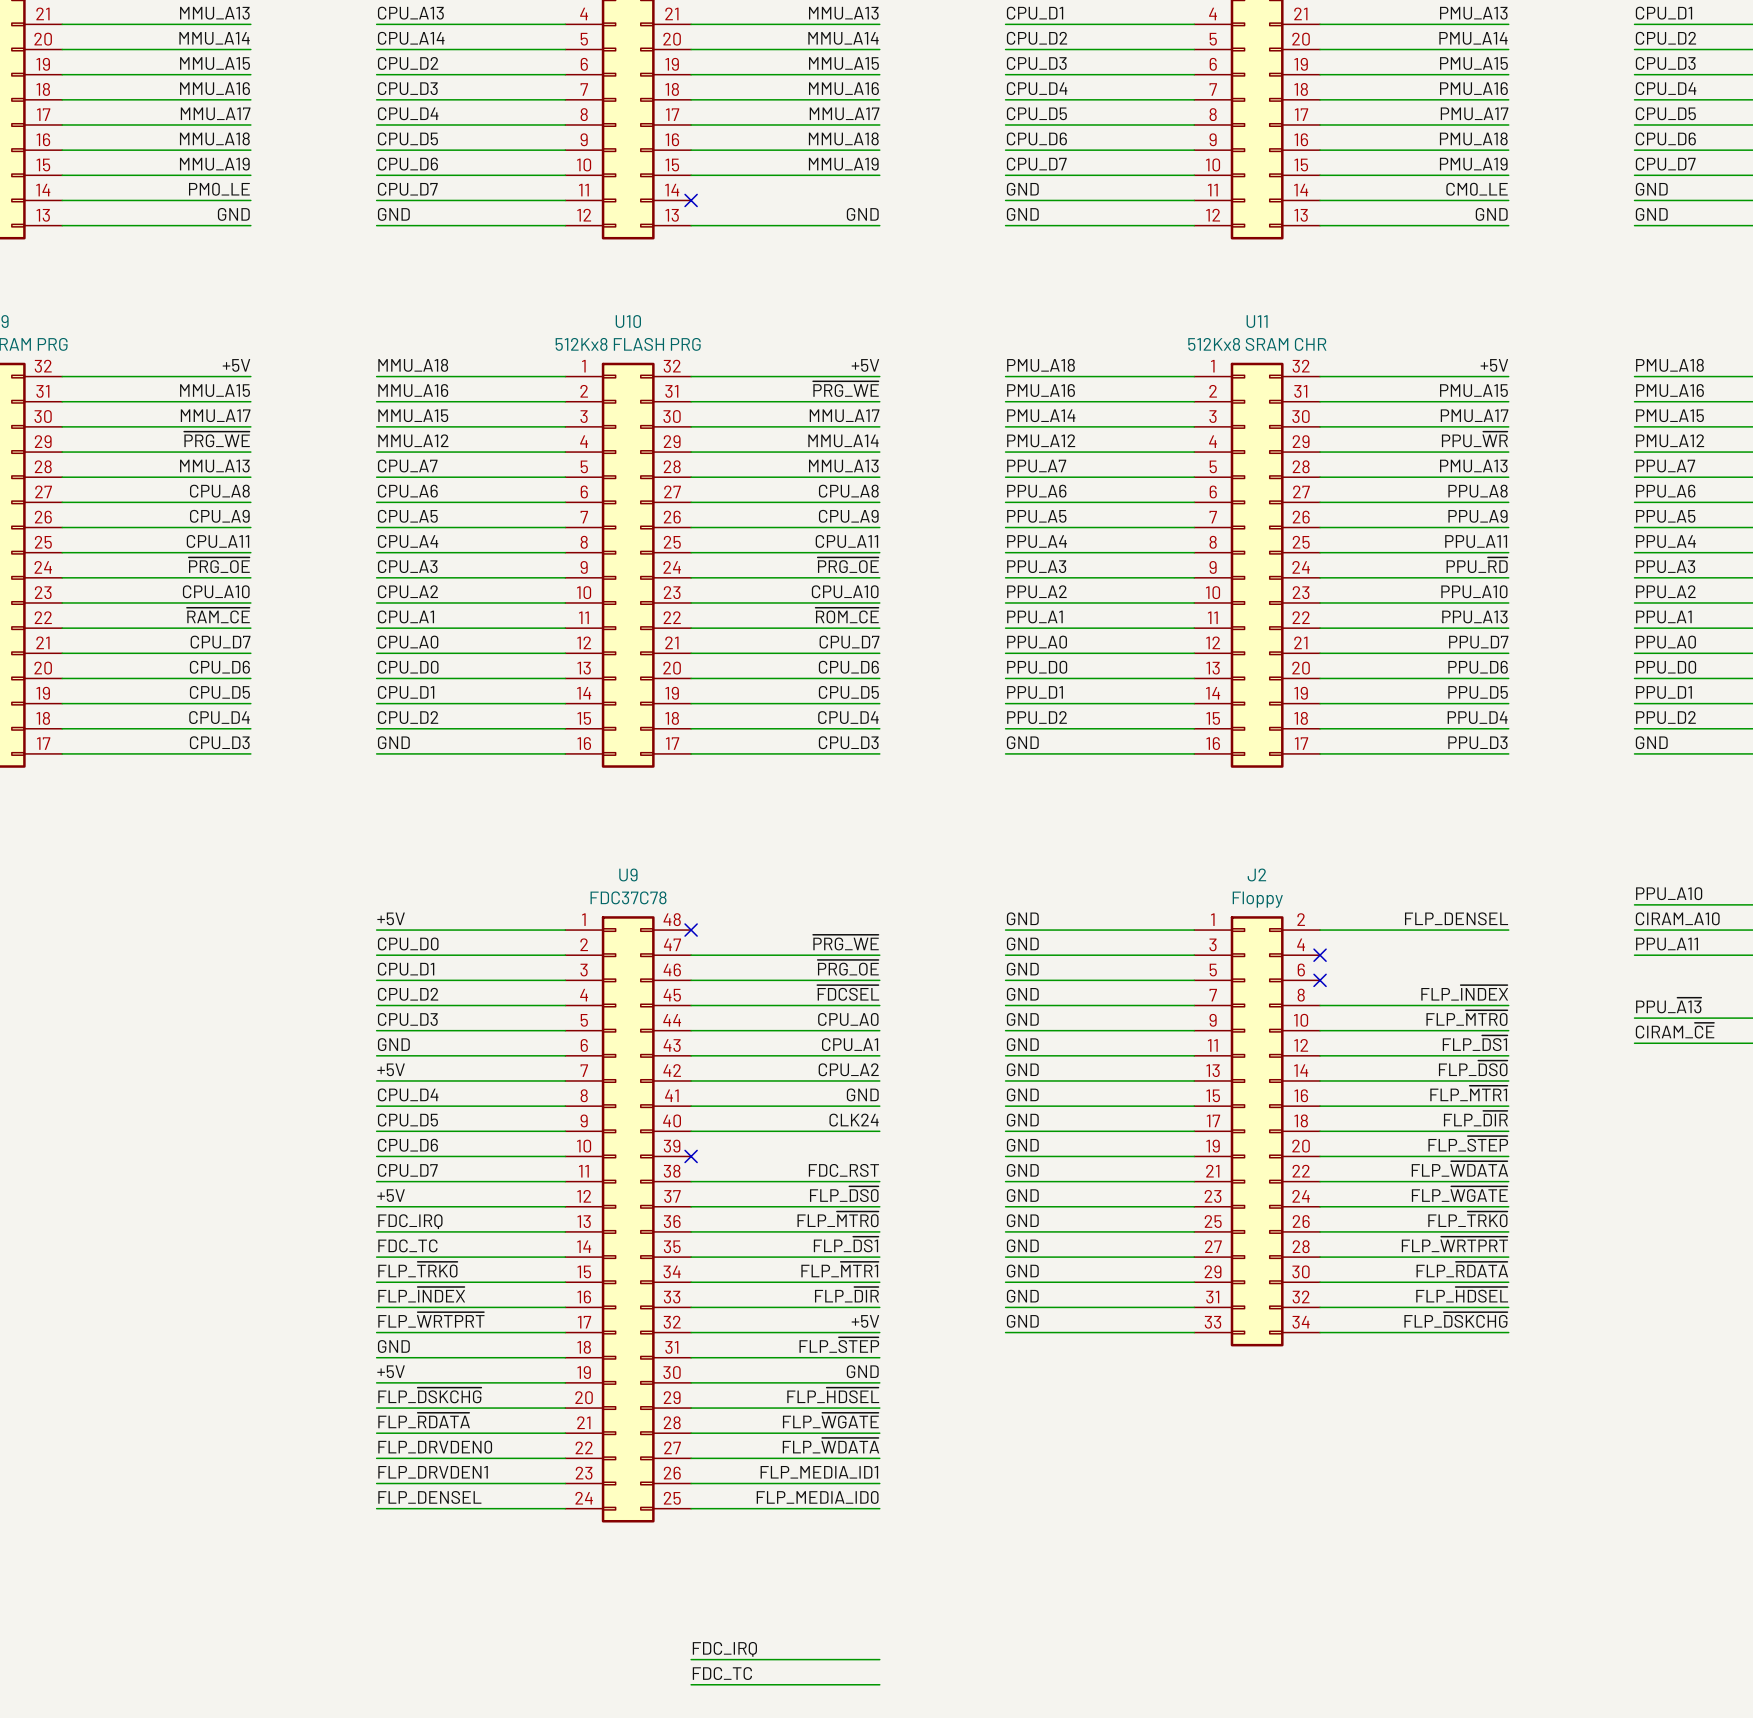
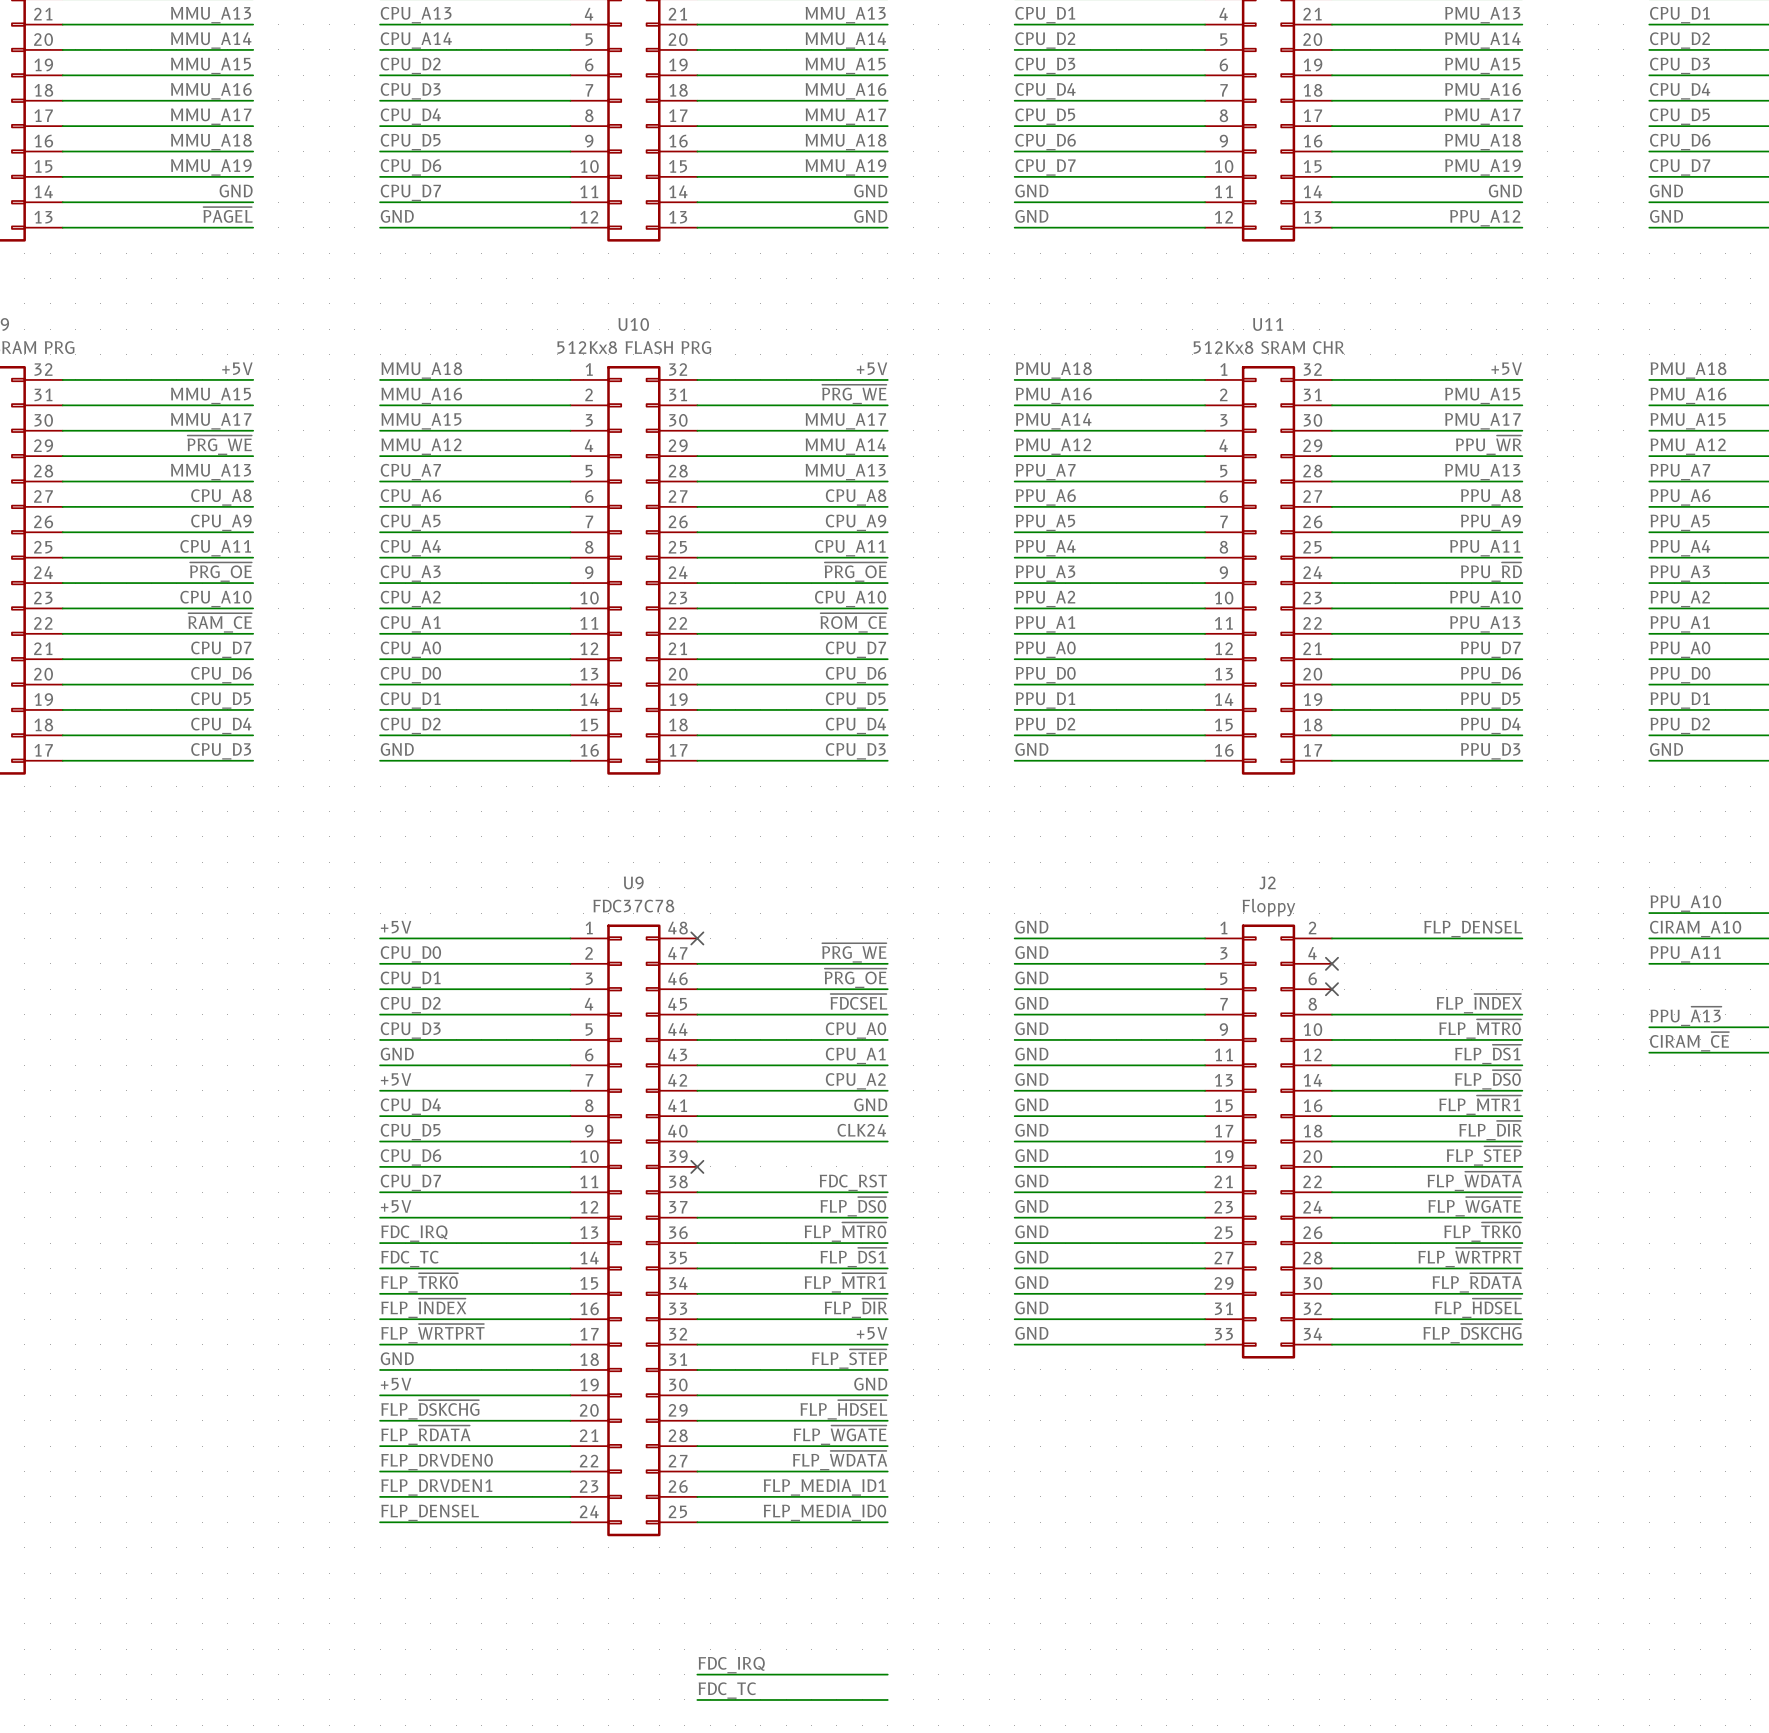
label: PM0_LE (219, 189) -> GND (236, 191)
label: none -> GND (870, 191)
label: CM0_LE (1477, 189) -> GND (1505, 191)
wire: none -> (697, 202) (887, 202)
no-connect mark: (691, 200) -> none
label: GND (233, 214) -> ~{PAGEL} (228, 214)
label: GND (1491, 214) -> PPU_A12 (1485, 218)

